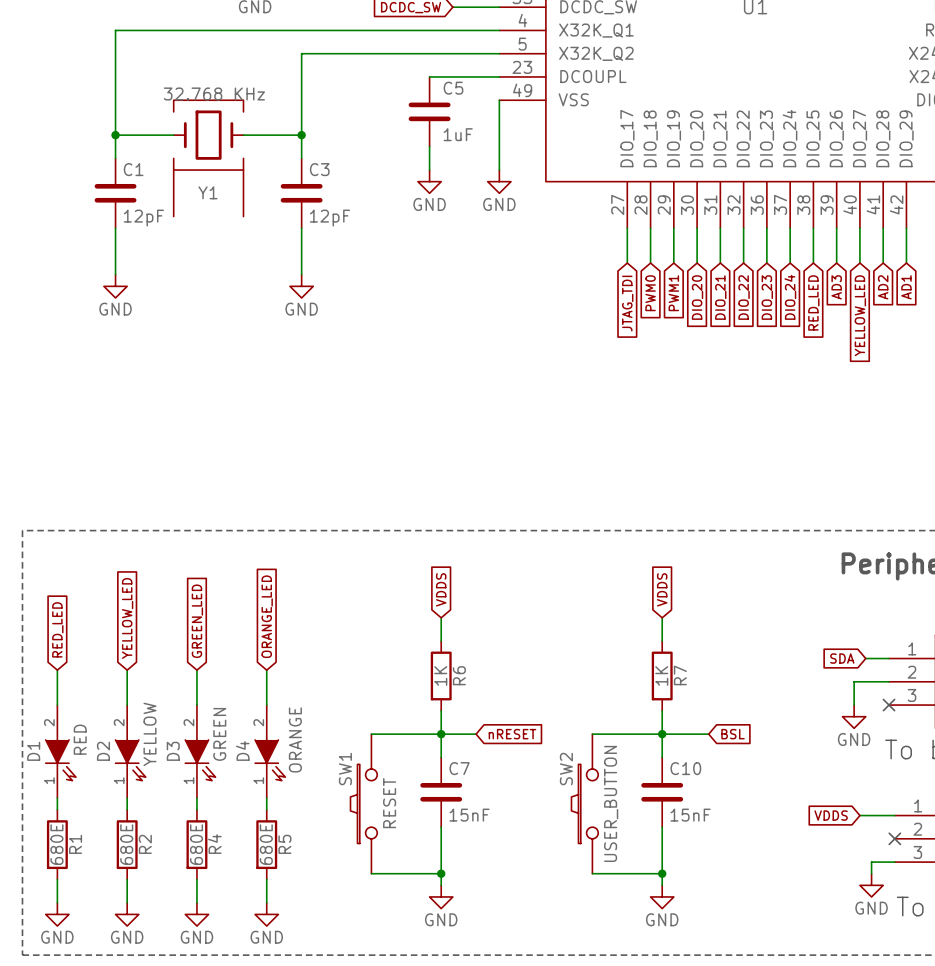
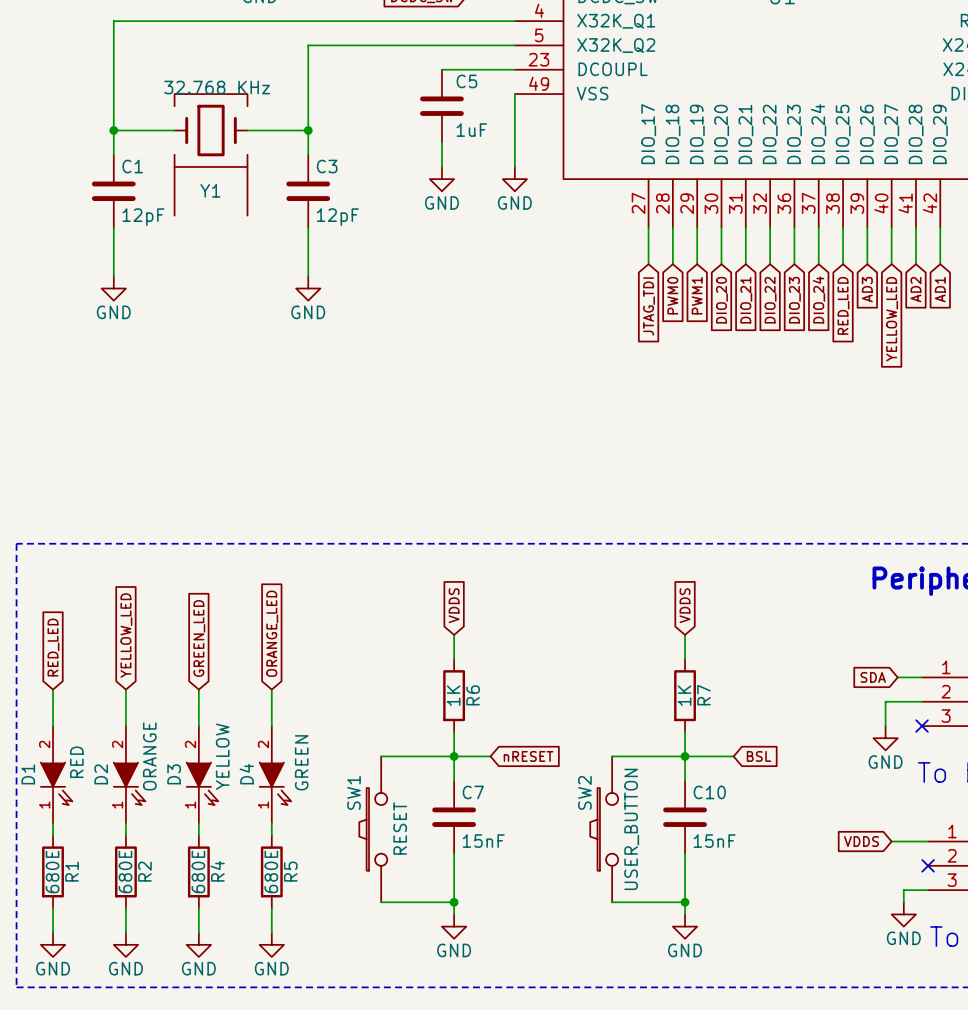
D2 value: YELLOW (150, 734) -> ORANGE (149, 756)
D3 value: GREEN (219, 734) -> YELLOW (222, 756)
D4 value: ORANGE (295, 739) -> GREEN (301, 762)

